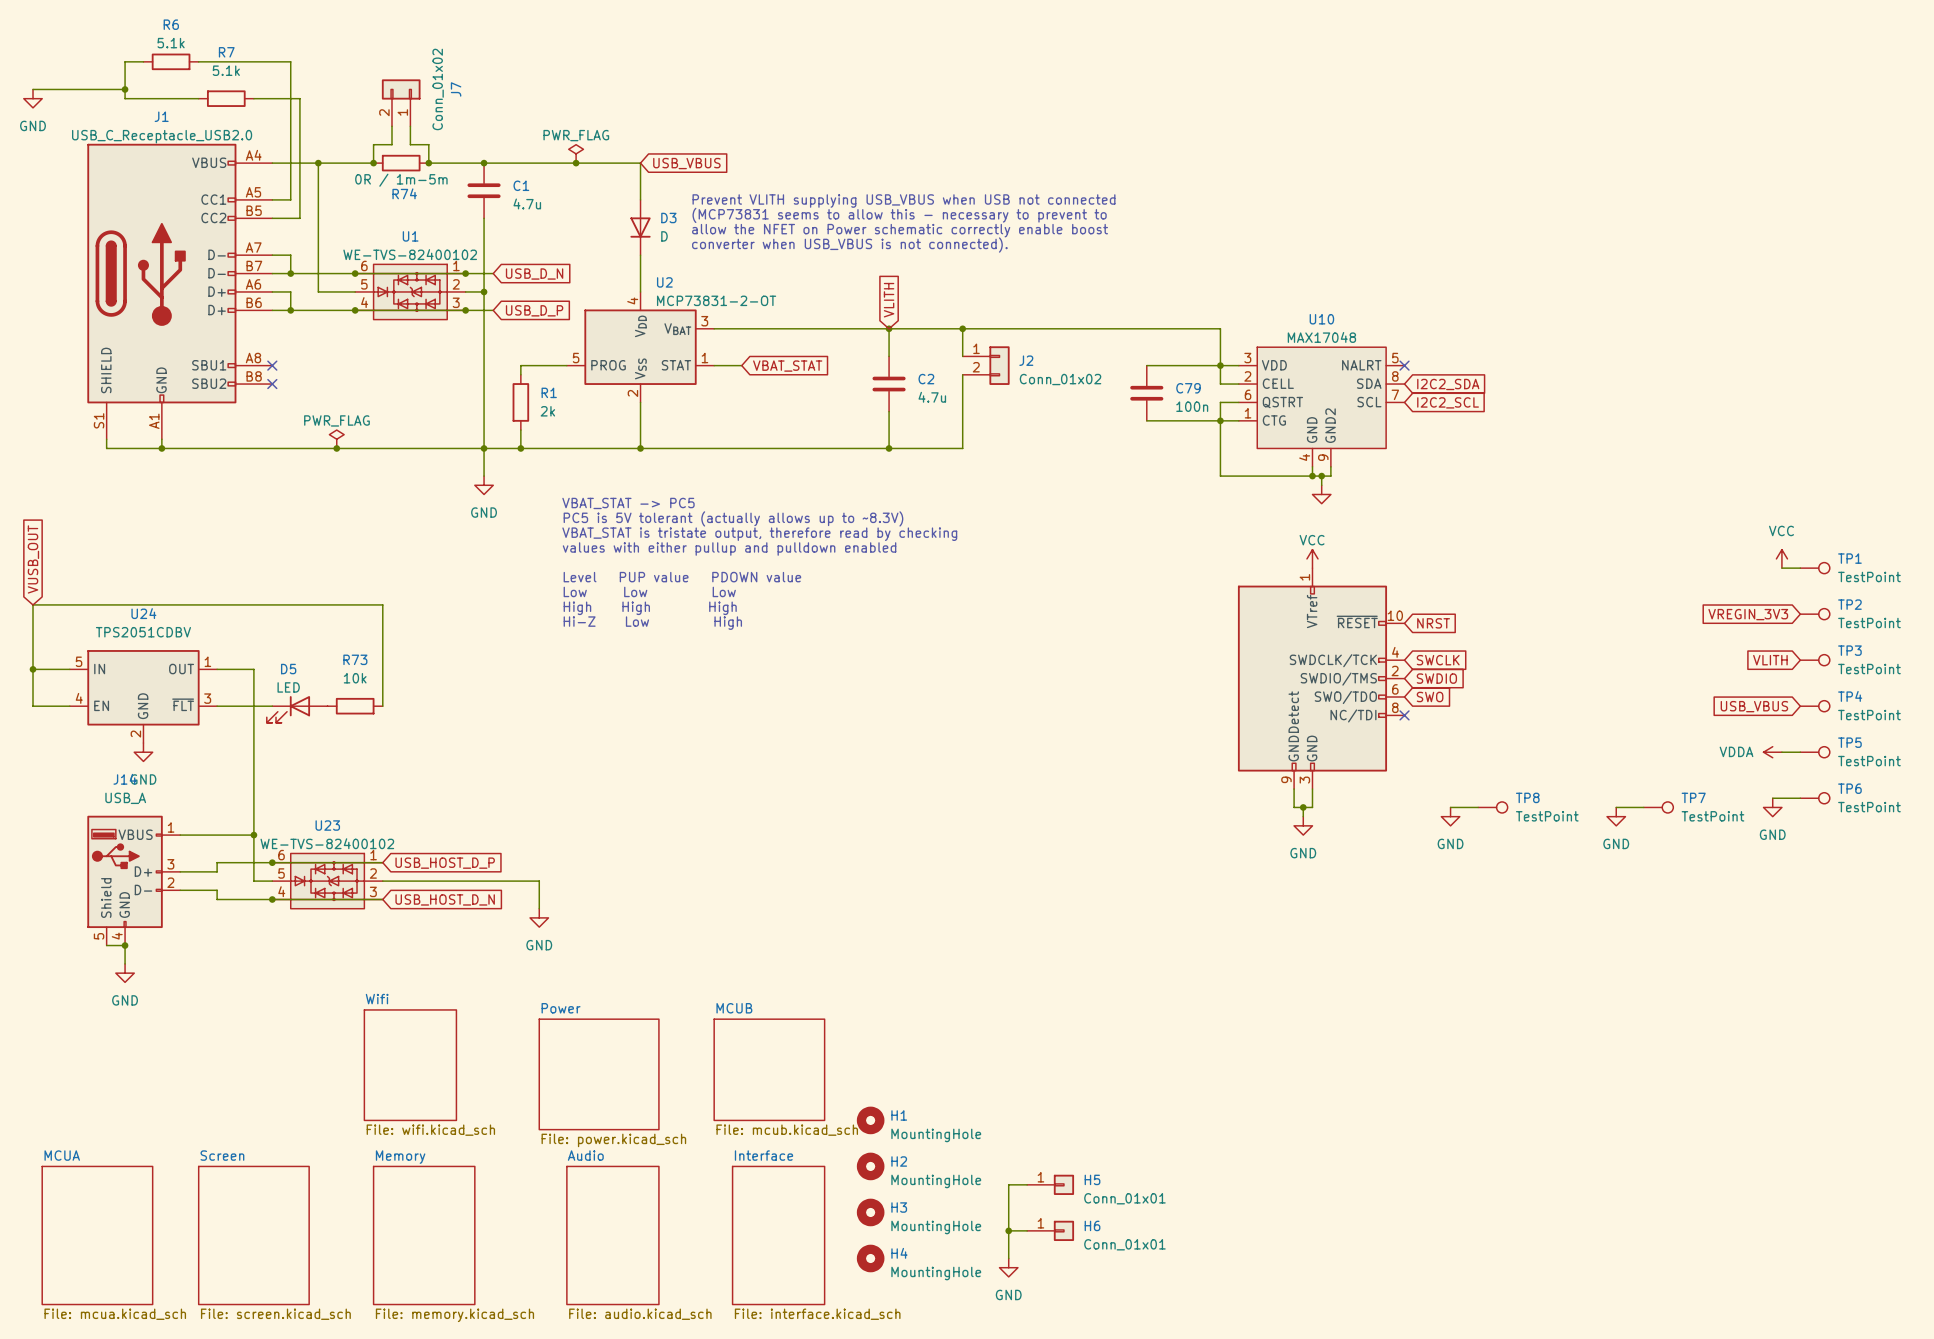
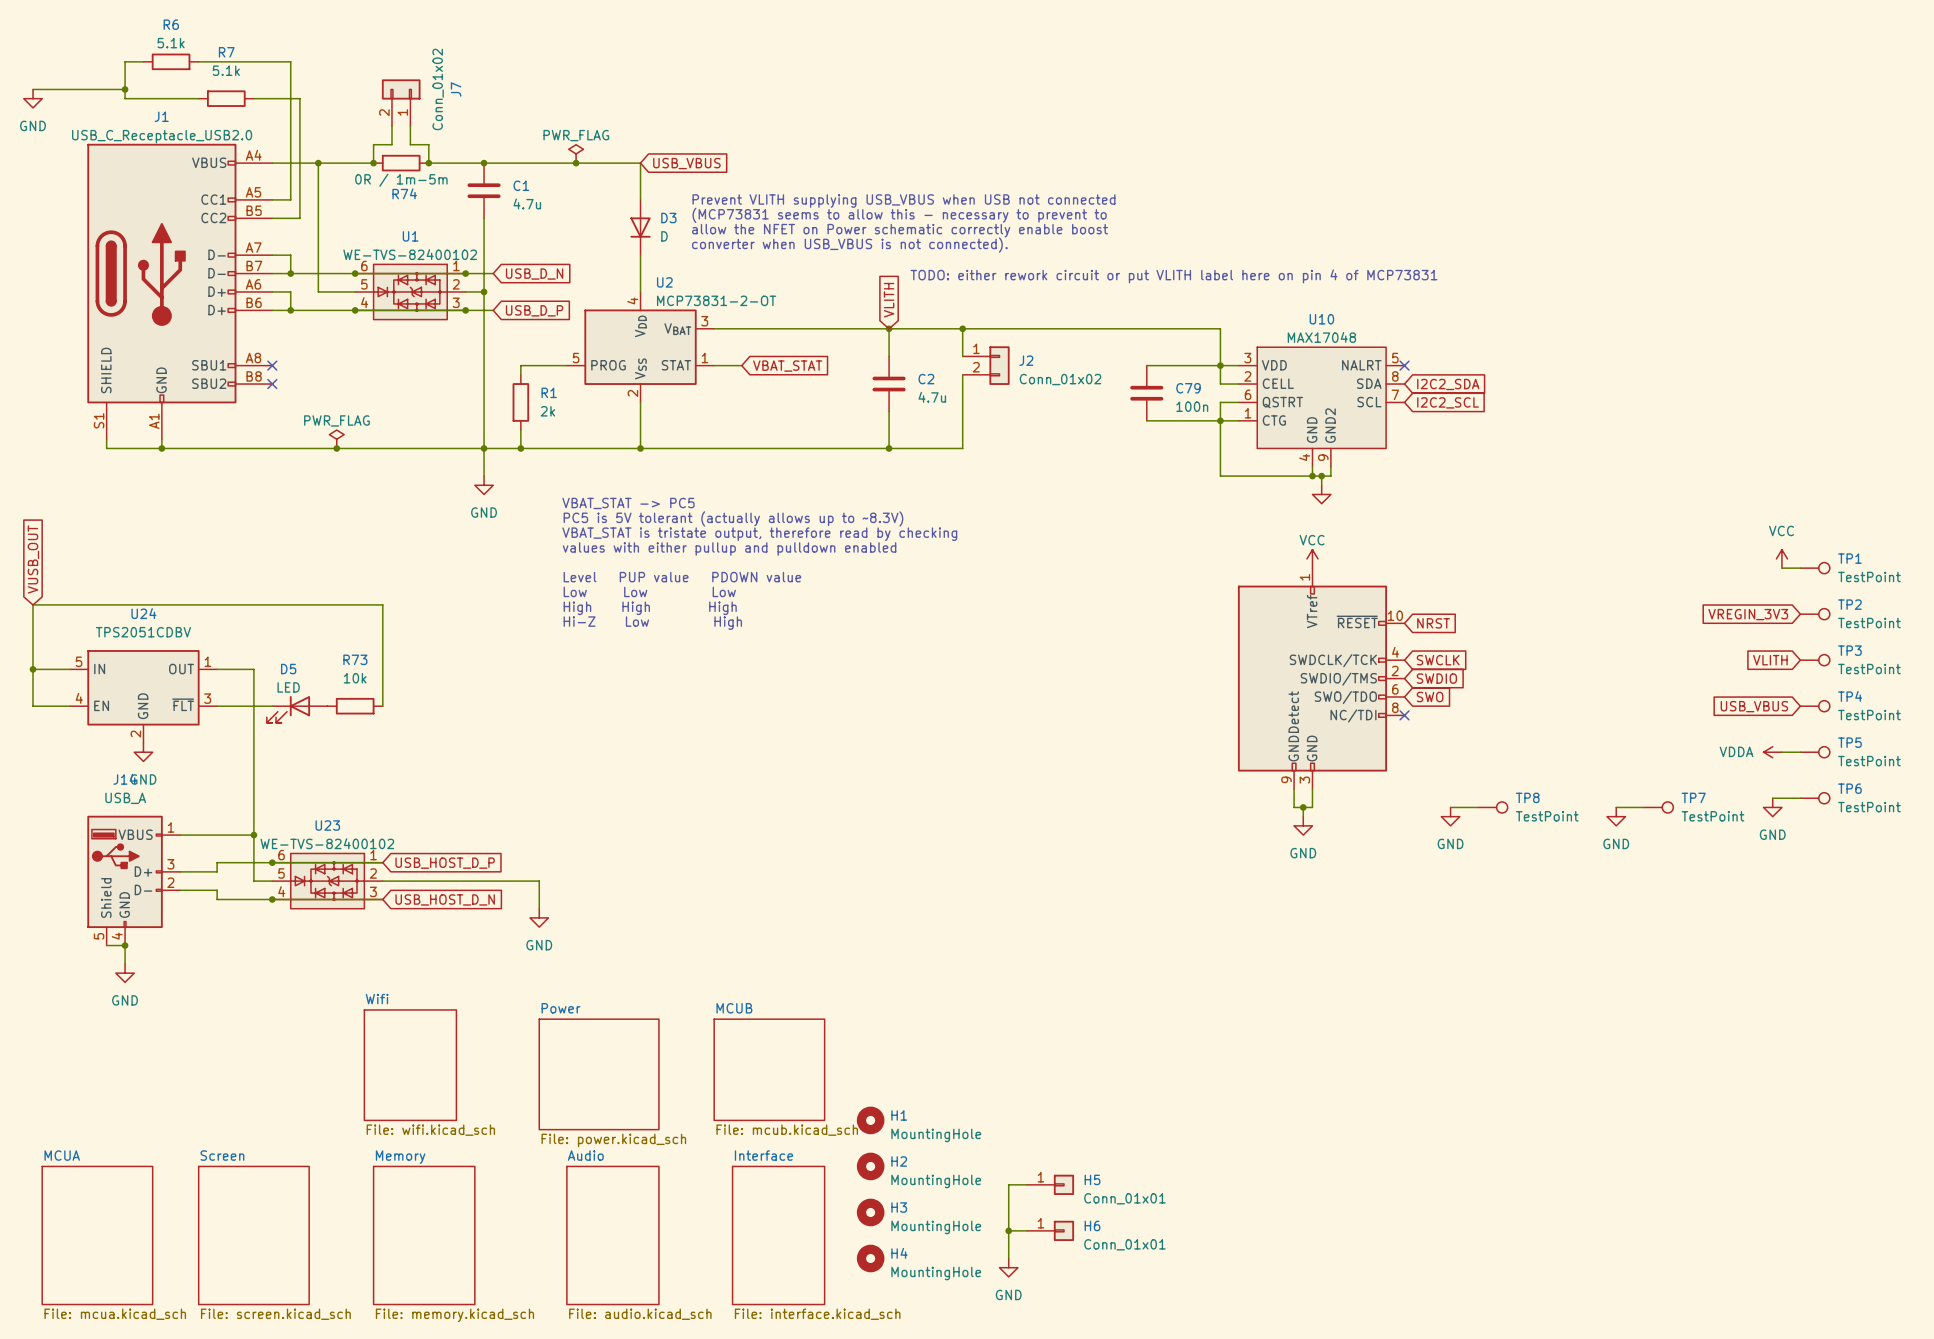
text: none -> TODO: either rework circuit or put VLITH label here on pin 4 of MCP73831 (1173, 276)

